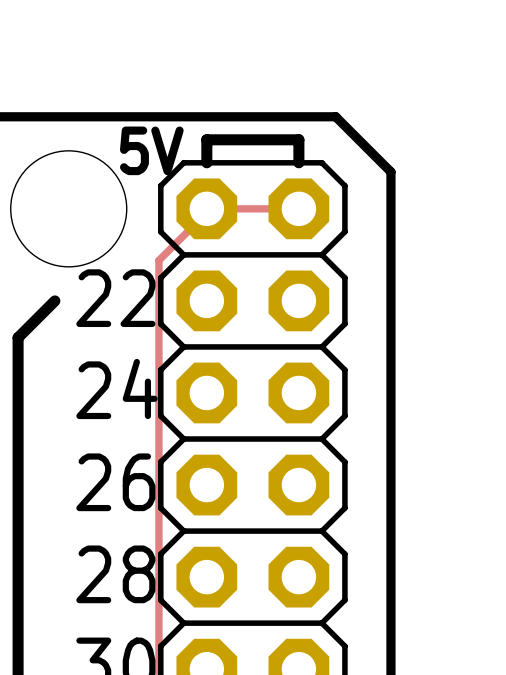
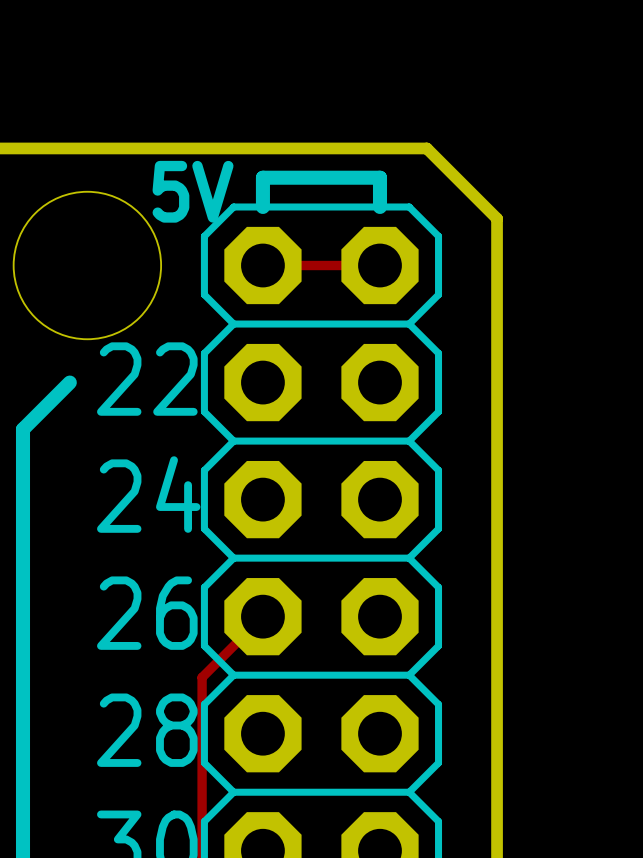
track: (210, 208) (158, 260) (158, 532) -> (262, 616) (202, 677)

